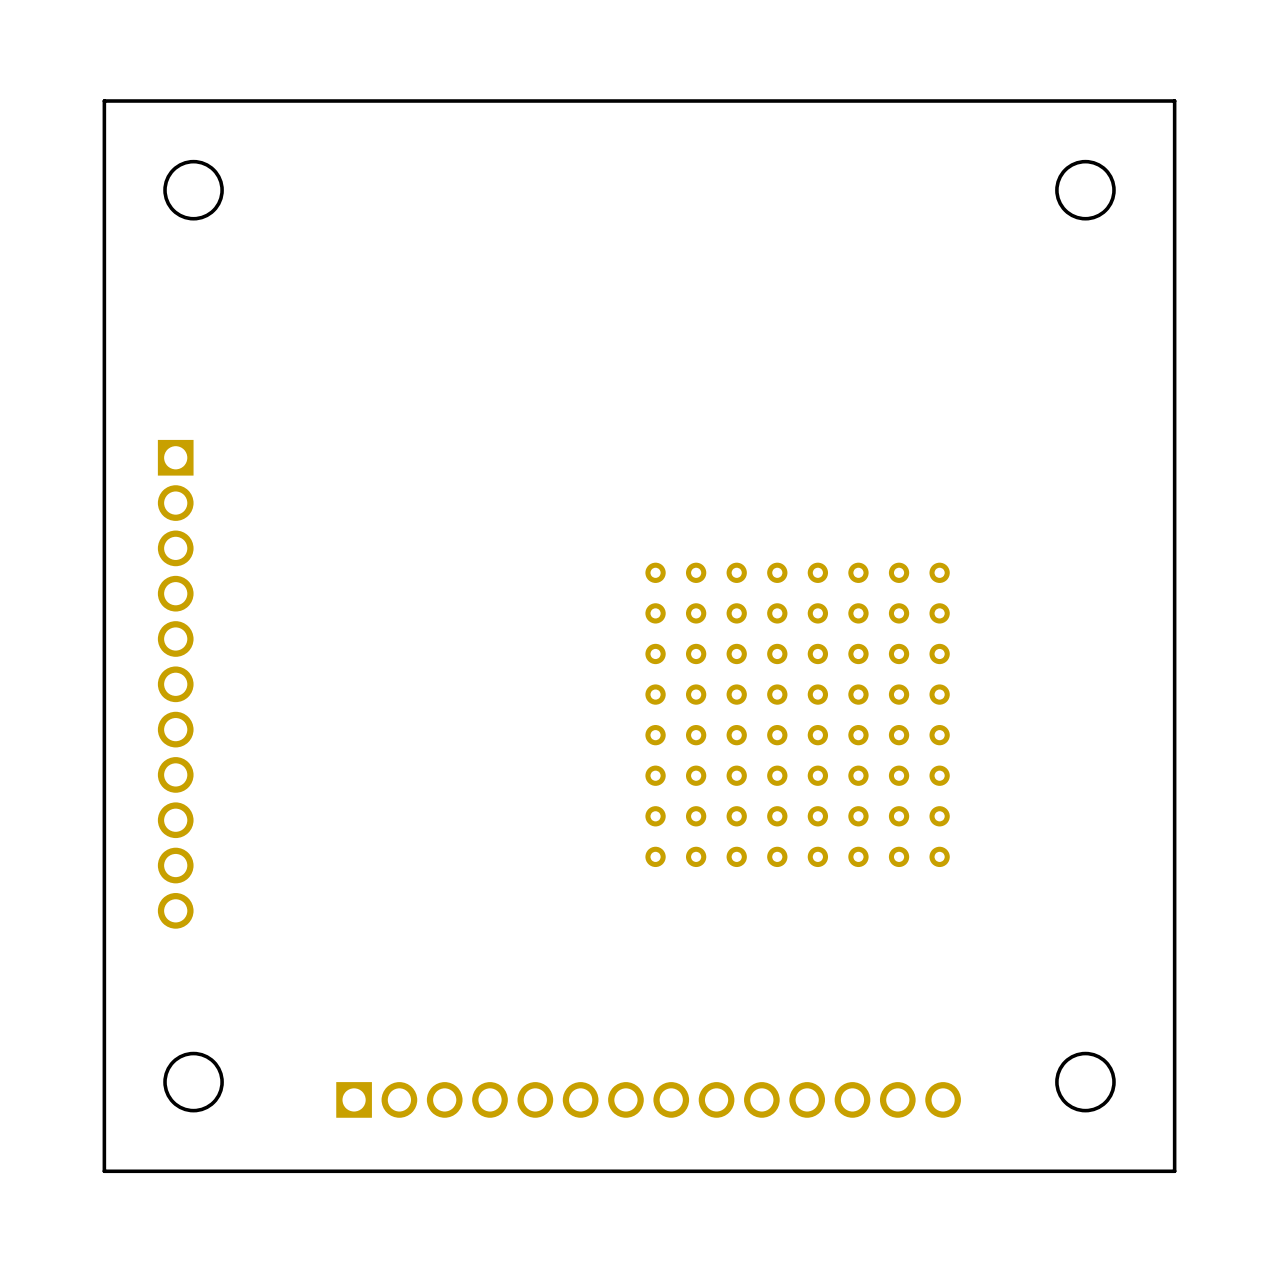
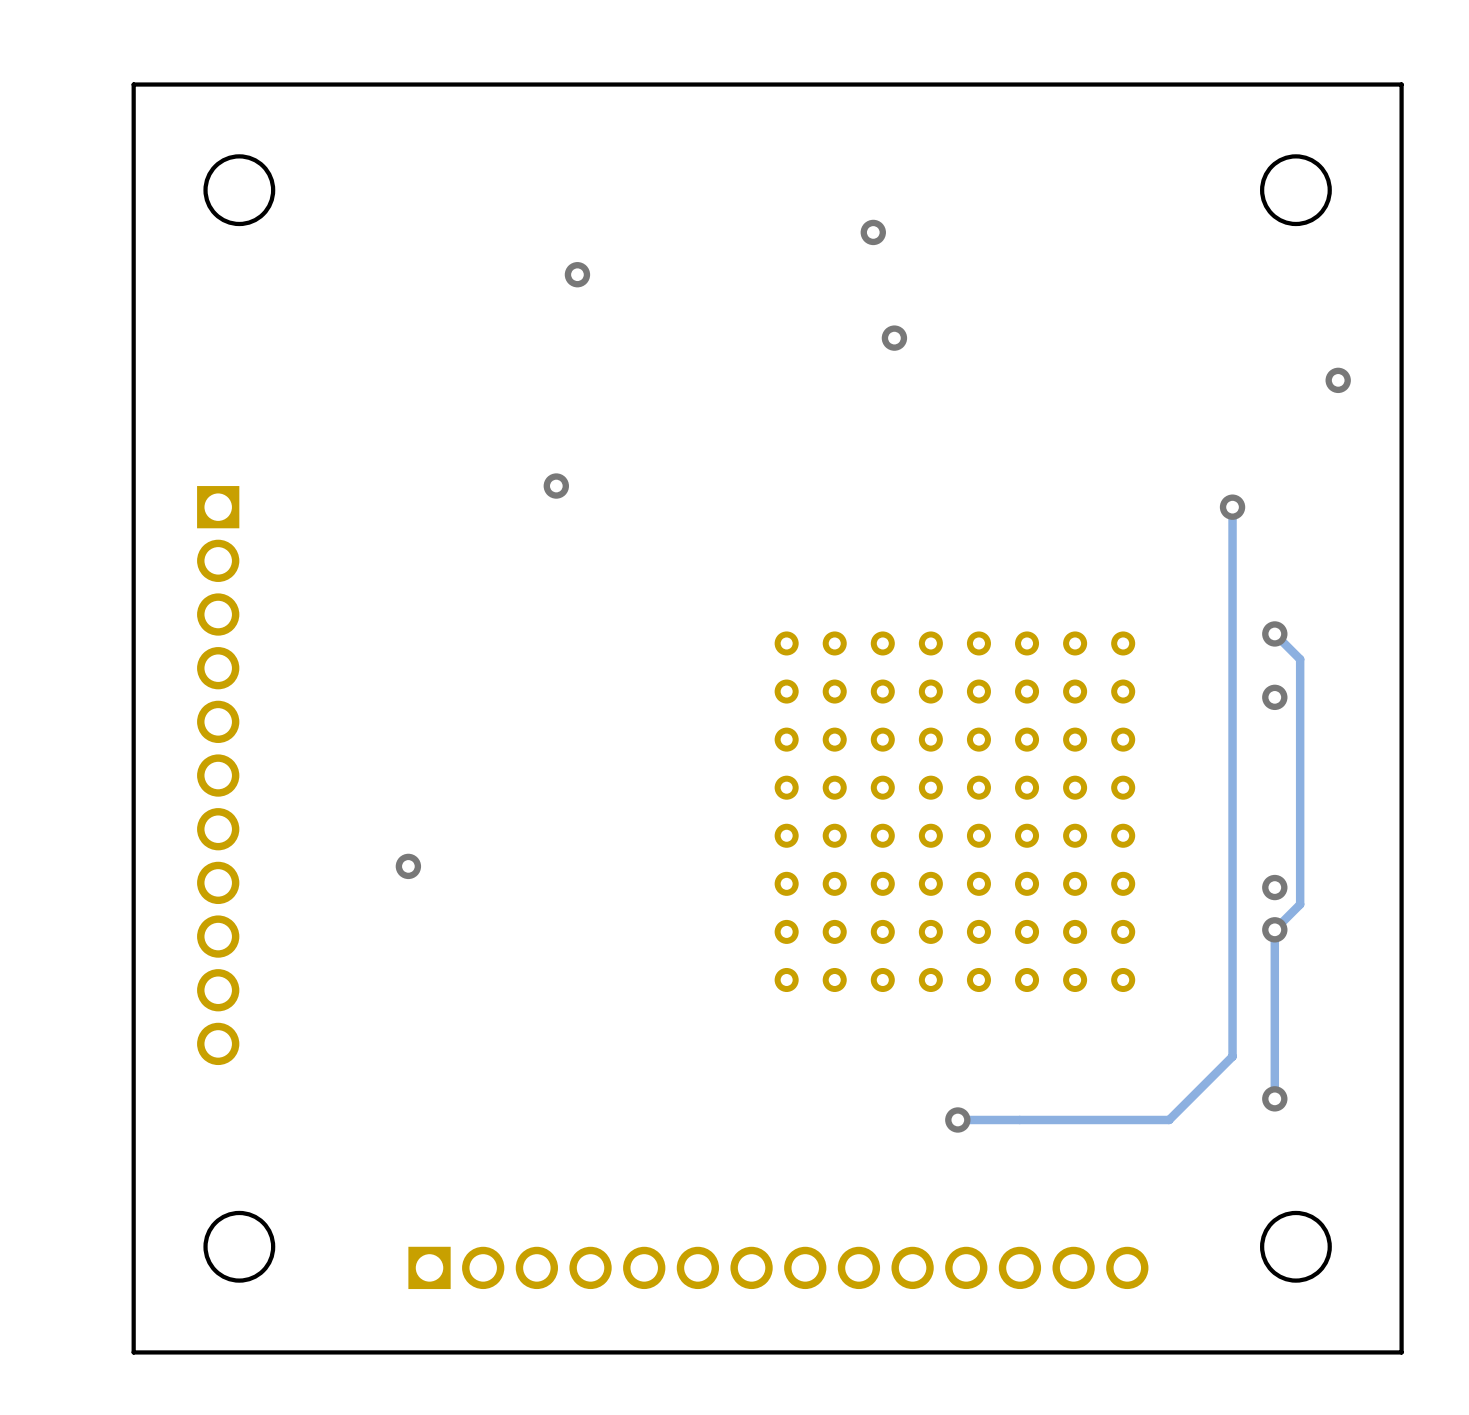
via: none -> (873, 232)
via: none -> (577, 274)
via: none -> (894, 338)
via: none -> (1338, 380)
via: none -> (556, 486)
track: none -> (1232, 507) (1232, 1056) (1169, 1119) (957, 1119)
via: none -> (1232, 507)
track: none -> (1274, 633) (1300, 659) (1300, 904) (1274, 929) (1274, 1098)
via: none -> (1274, 633)
via: none -> (1274, 697)
via: none -> (408, 866)
via: none -> (1274, 887)
via: none -> (1274, 929)
via: none -> (1274, 1098)
via: none -> (957, 1119)

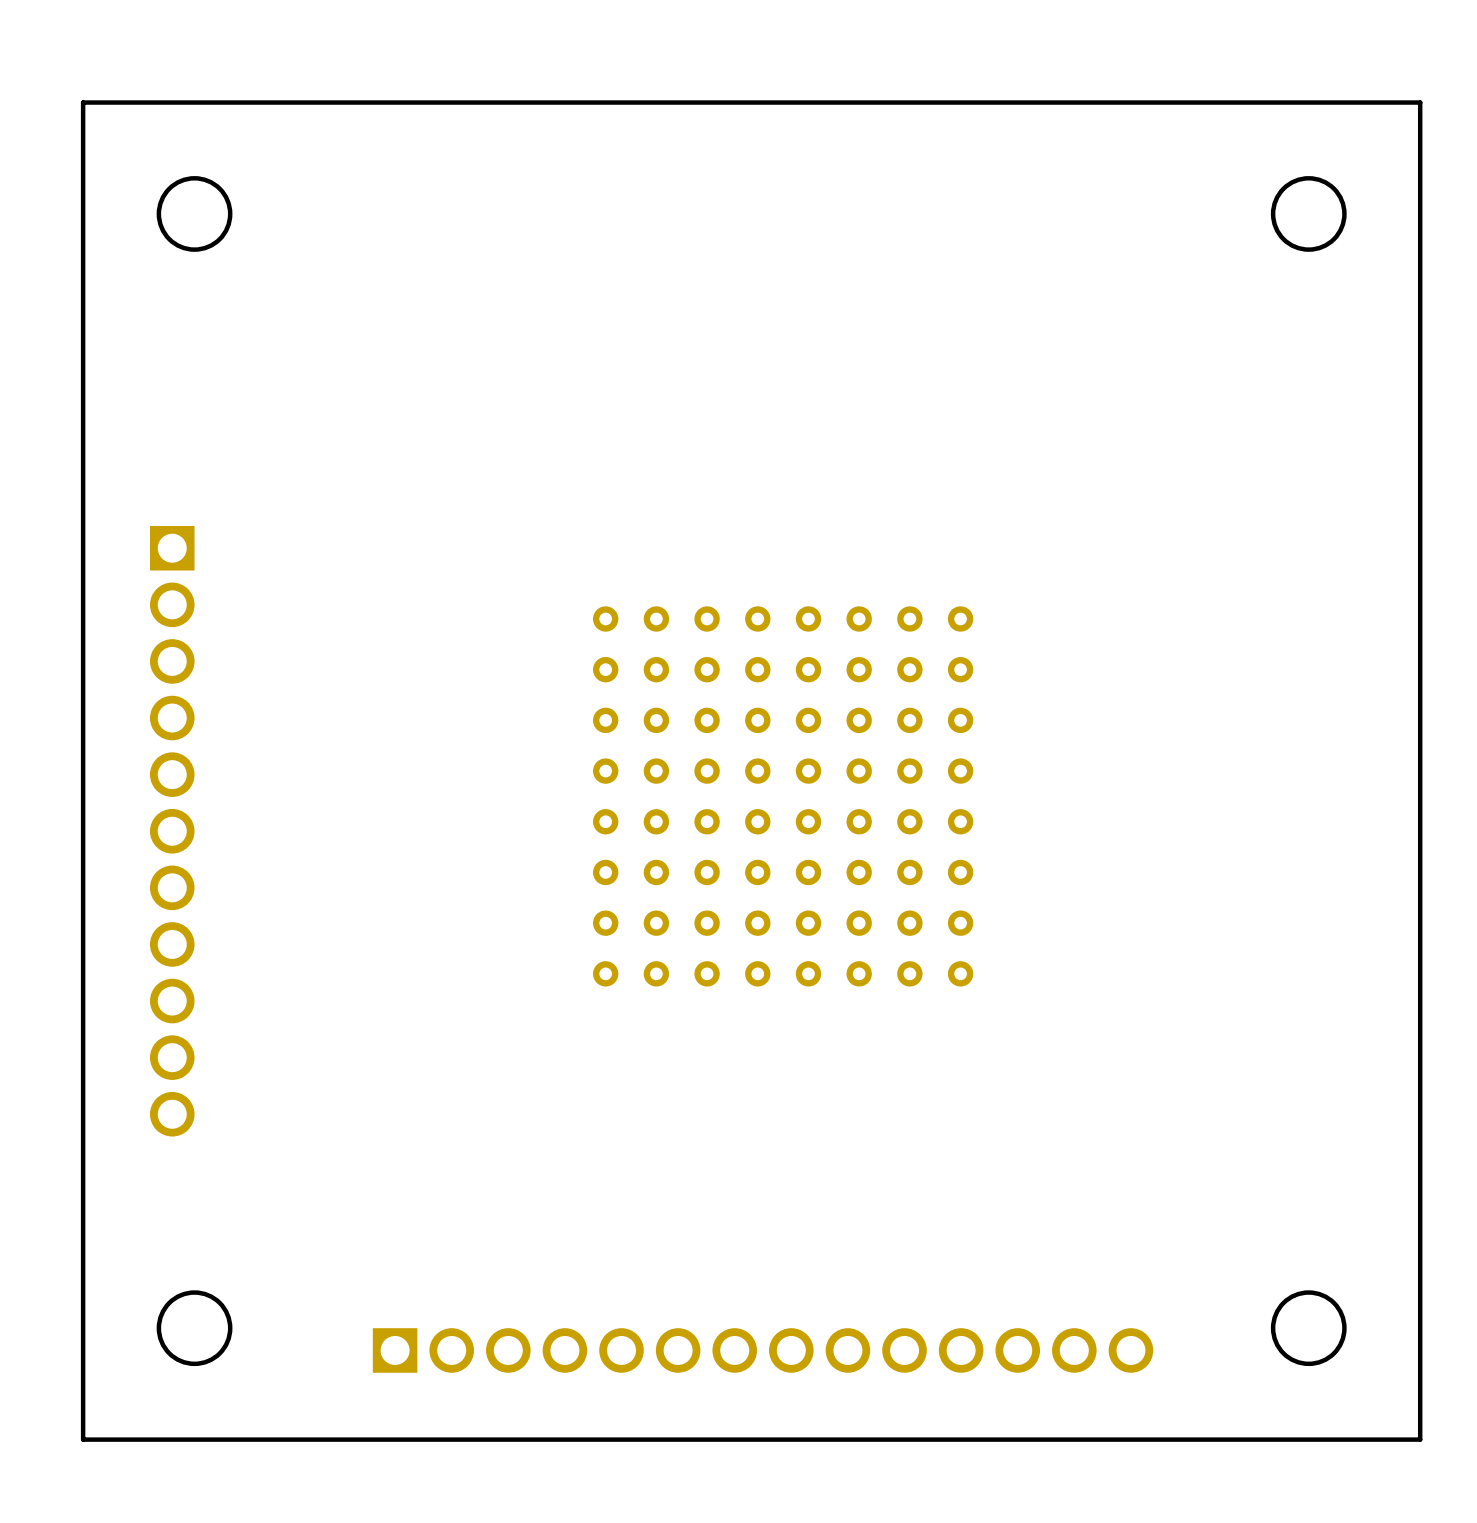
via: (873, 232) -> none
via: (577, 274) -> none
via: (894, 338) -> none
via: (1338, 380) -> none
via: (556, 486) -> none
track: (1232, 507) (1232, 1056) (1169, 1119) (957, 1119) -> none
via: (1232, 507) -> none
track: (1274, 633) (1300, 659) (1300, 904) (1274, 929) (1274, 1098) -> none
via: (1274, 633) -> none
via: (1274, 697) -> none
part position: (954, 811) -> (783, 796)
via: (408, 866) -> none
via: (1274, 887) -> none
via: (1274, 929) -> none
via: (1274, 1098) -> none
via: (957, 1119) -> none

